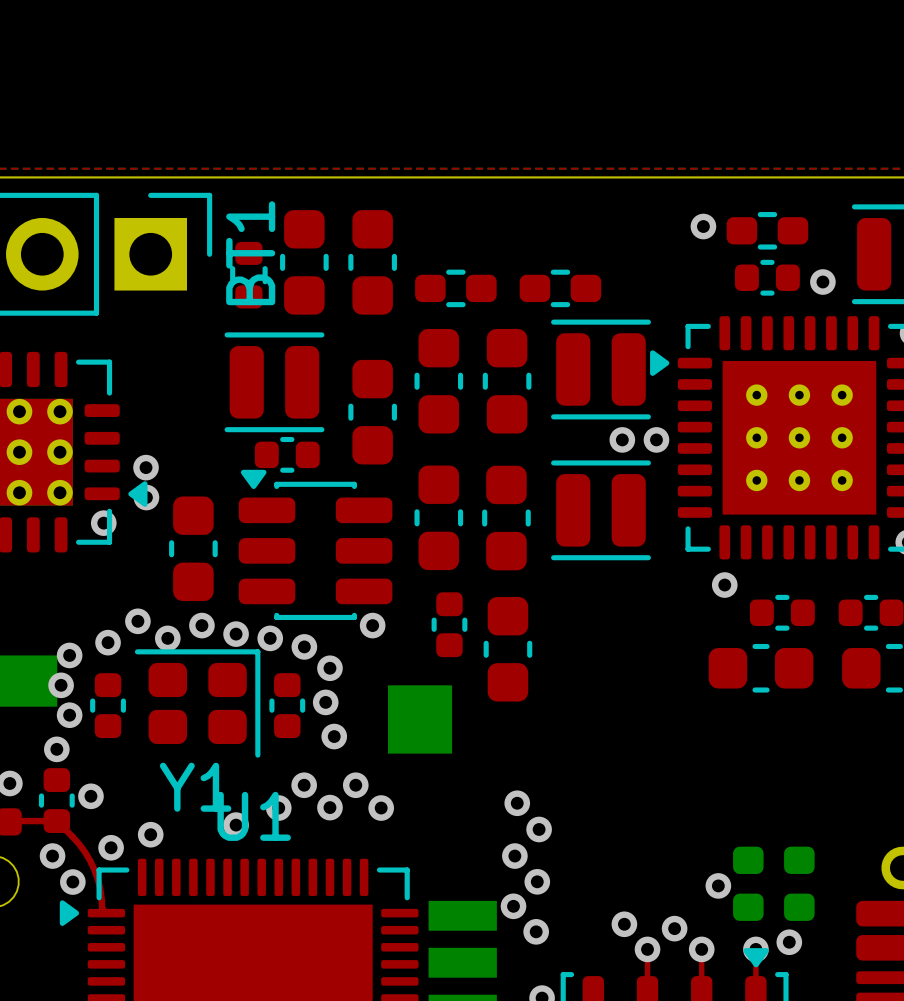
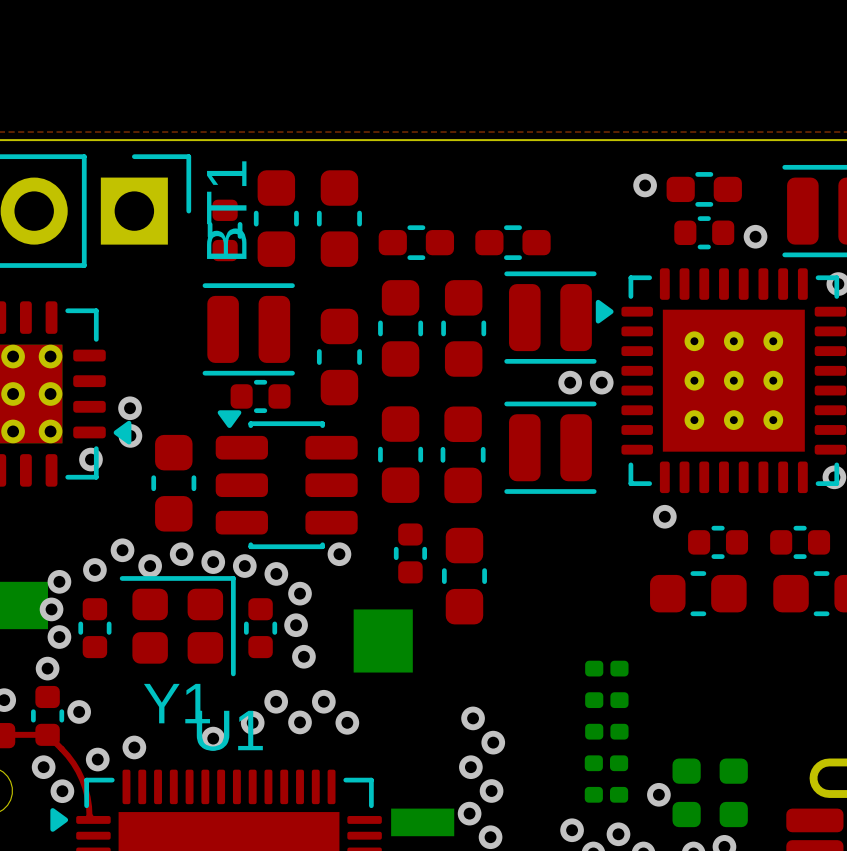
part: none -> (606, 668)
part: none -> (606, 700)
part: none -> (606, 731)
part: none -> (606, 763)
part: none -> (606, 794)

